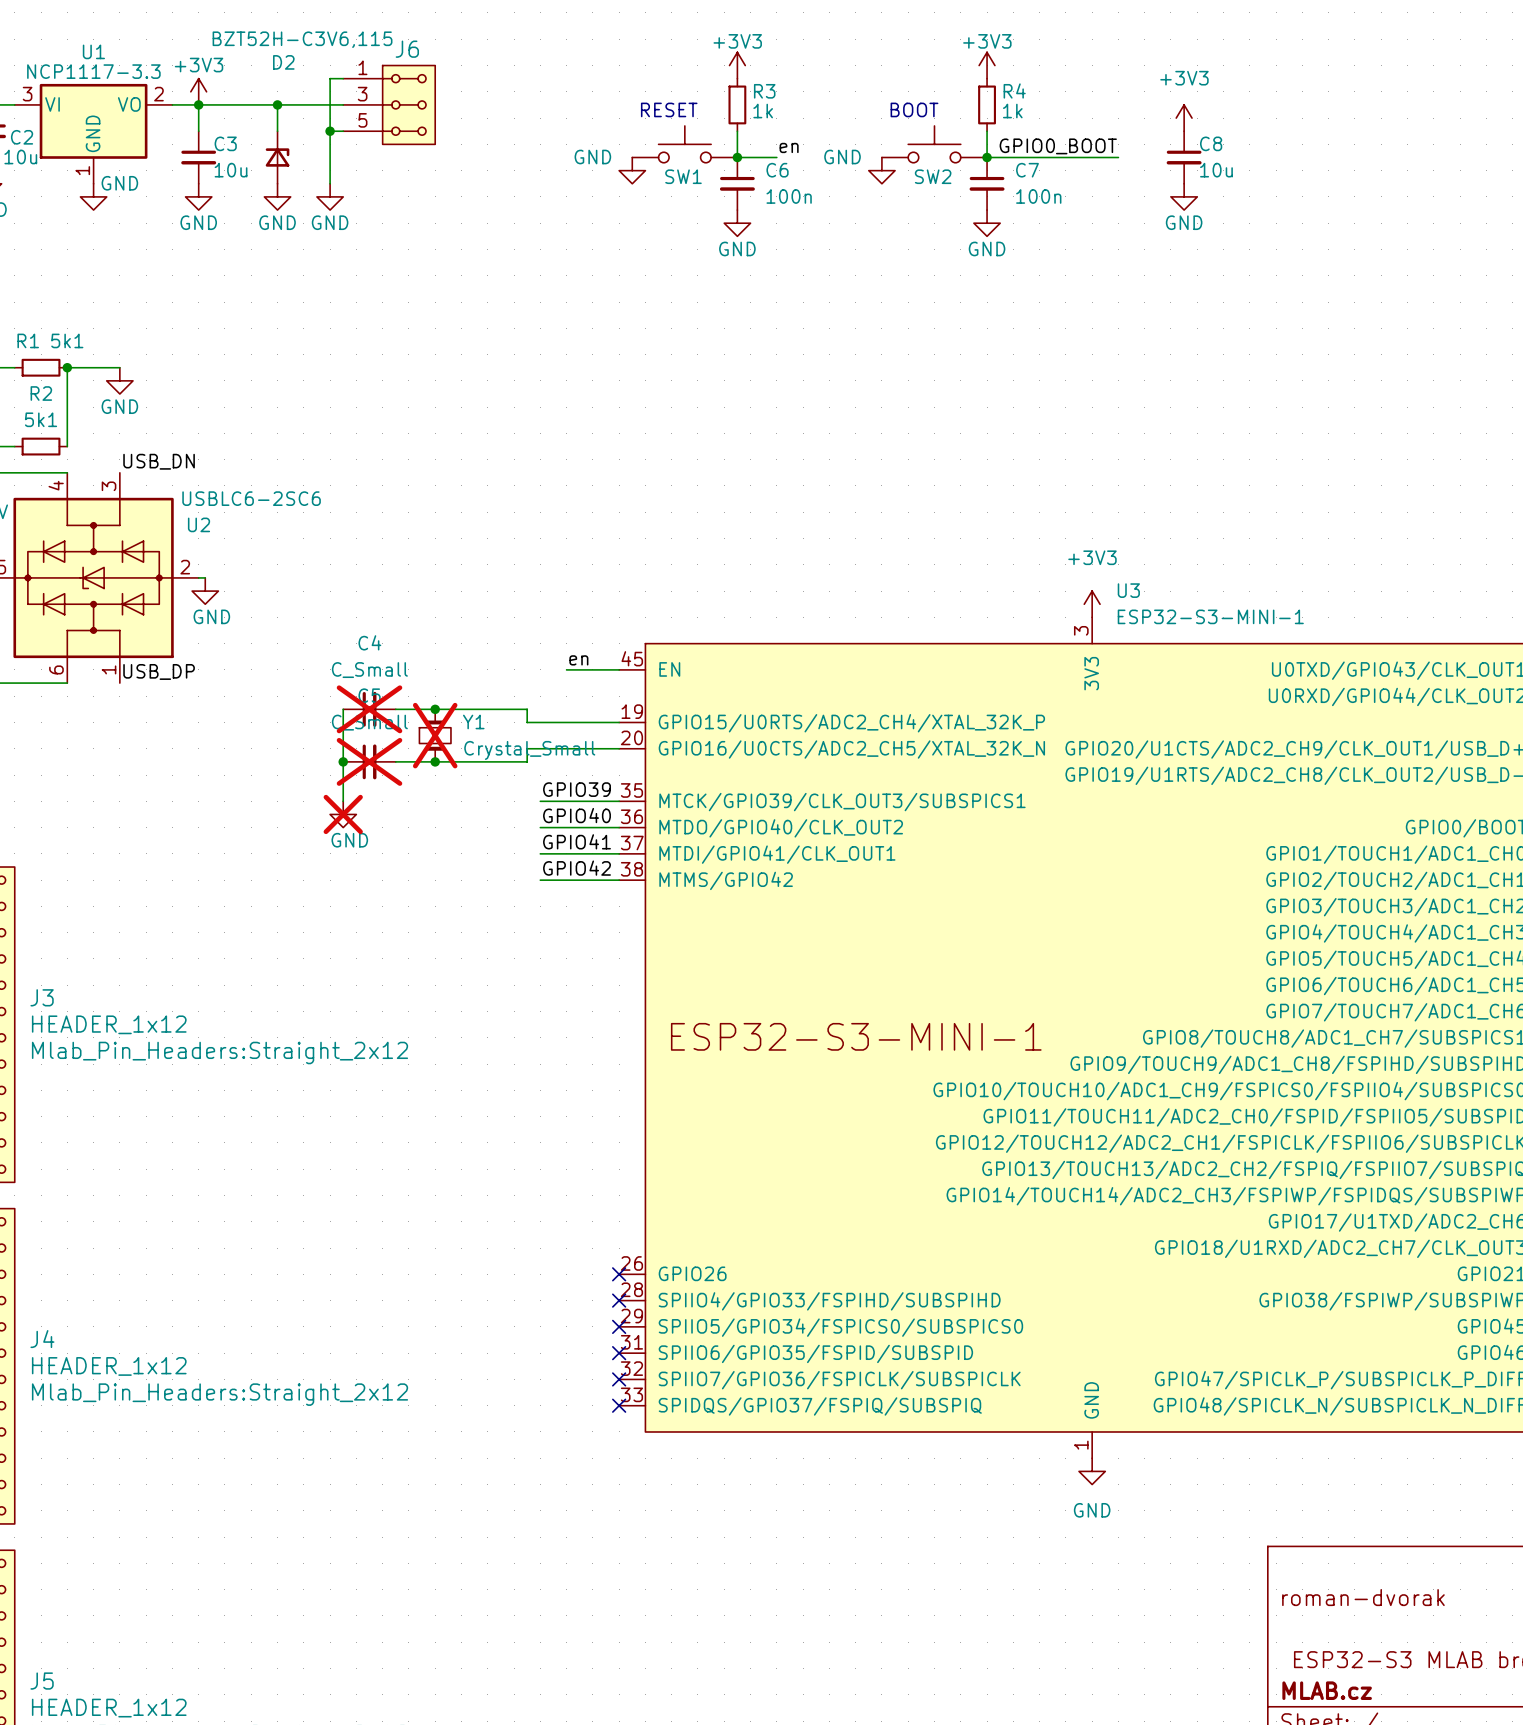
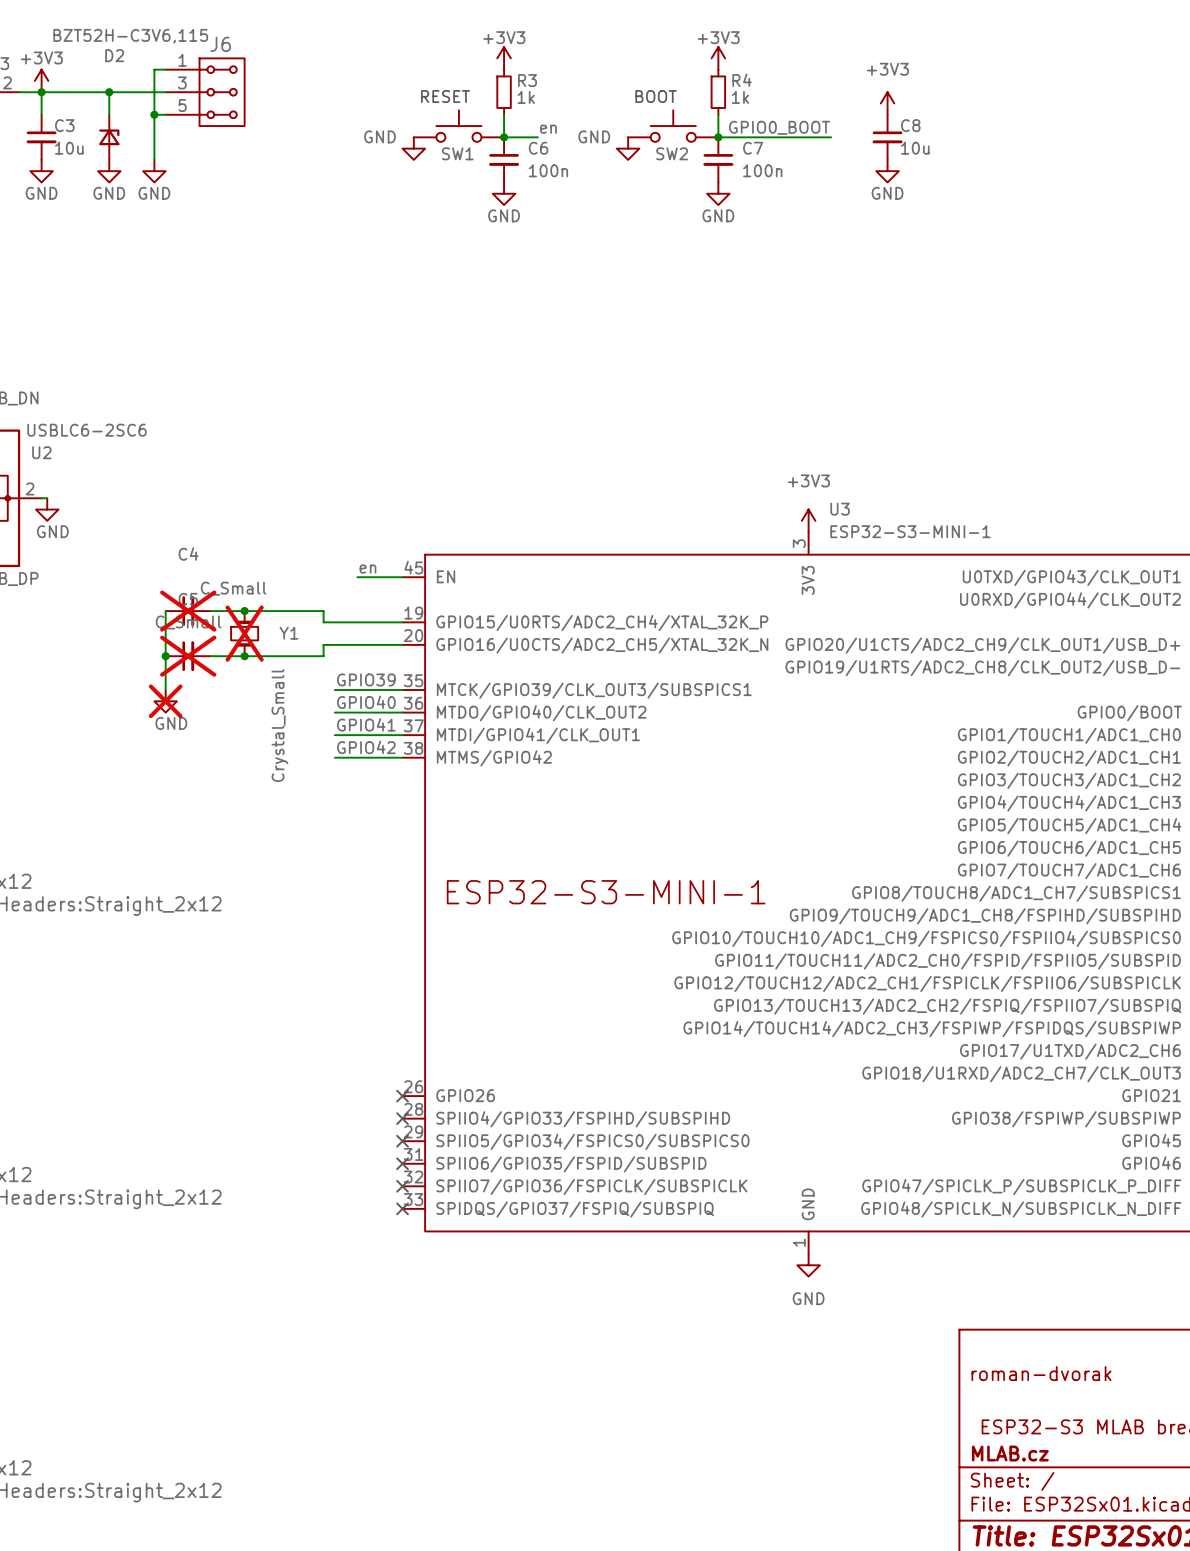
C4 value position: C_Small (369, 670) -> C_Small (233, 588)
Y1 name position: Y1 (473, 721) -> Y1 (289, 633)
Y1 value rotation: 0° (529, 750) -> 90° counterclockwise (279, 725)

